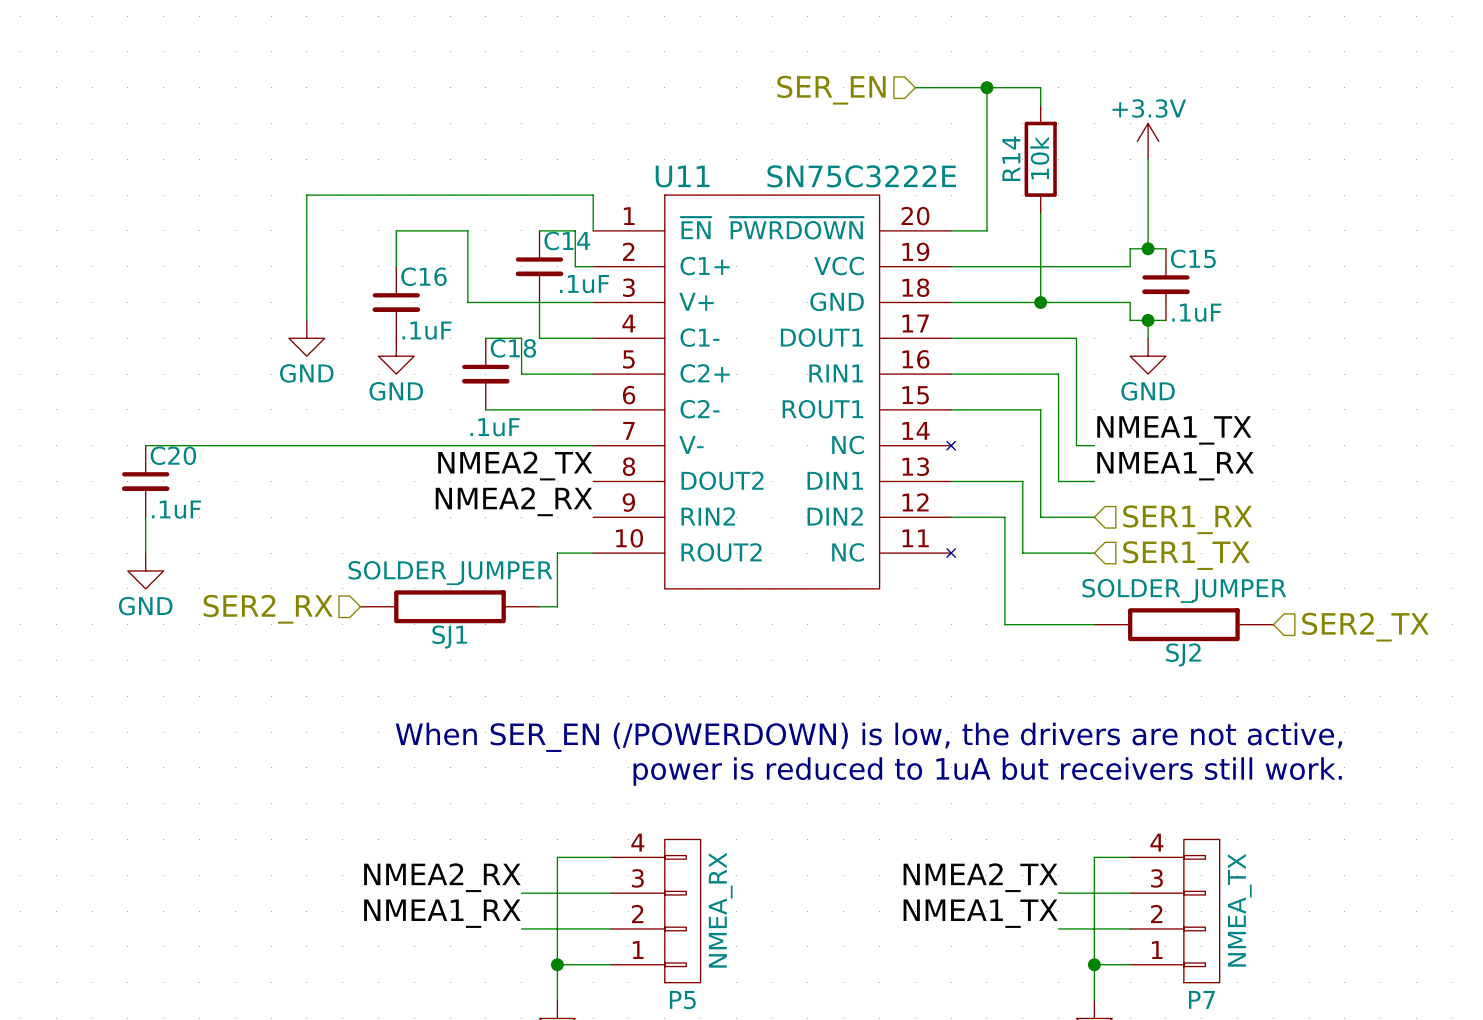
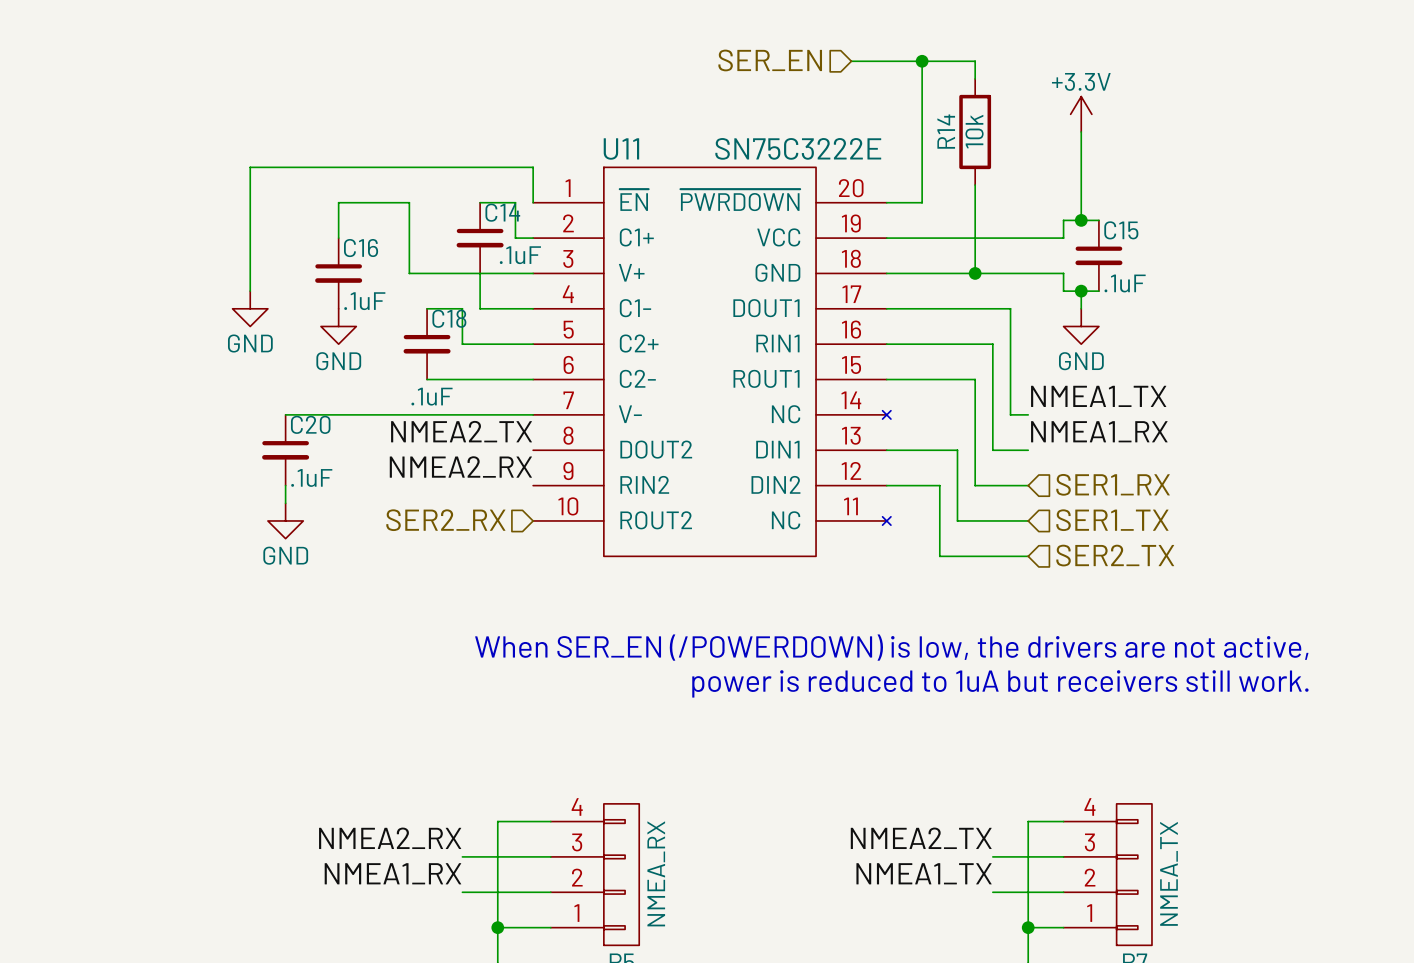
wire: (145, 445) (342, 445) -> none
C20 position: (145, 481) -> (285, 450)
wire: (145, 517) (145, 553) -> none
wire: none -> (285, 485) (285, 503)
wire: (593, 553) (557, 553) (557, 606) (539, 606) -> none
power symbol position: GND (145, 570) -> GND (285, 520)
wire: (1004, 588) (1004, 624) (1094, 624) -> (939, 556) (1028, 556)
SJ1: SOLDER_JUMPER (450, 606) -> none
hierarchical label position: SER2_RX (268, 609) -> SER2_RX (445, 520)
SJ2: SOLDER_JUMPER (1183, 624) -> none
hierarchical label position: SER2_TX (1365, 627) -> SER2_TX (1115, 555)
text position: When SER_EN (/POWERDOWN) is low, the drivers are not active, (868, 737) -> When SER_EN (/POWERDOWN) is low, the drivers are not active, (891, 647)
text position: power is reduced to 1uA but receivers still work. (987, 771) -> power is reduced to 1uA but receivers still work. (1000, 683)

